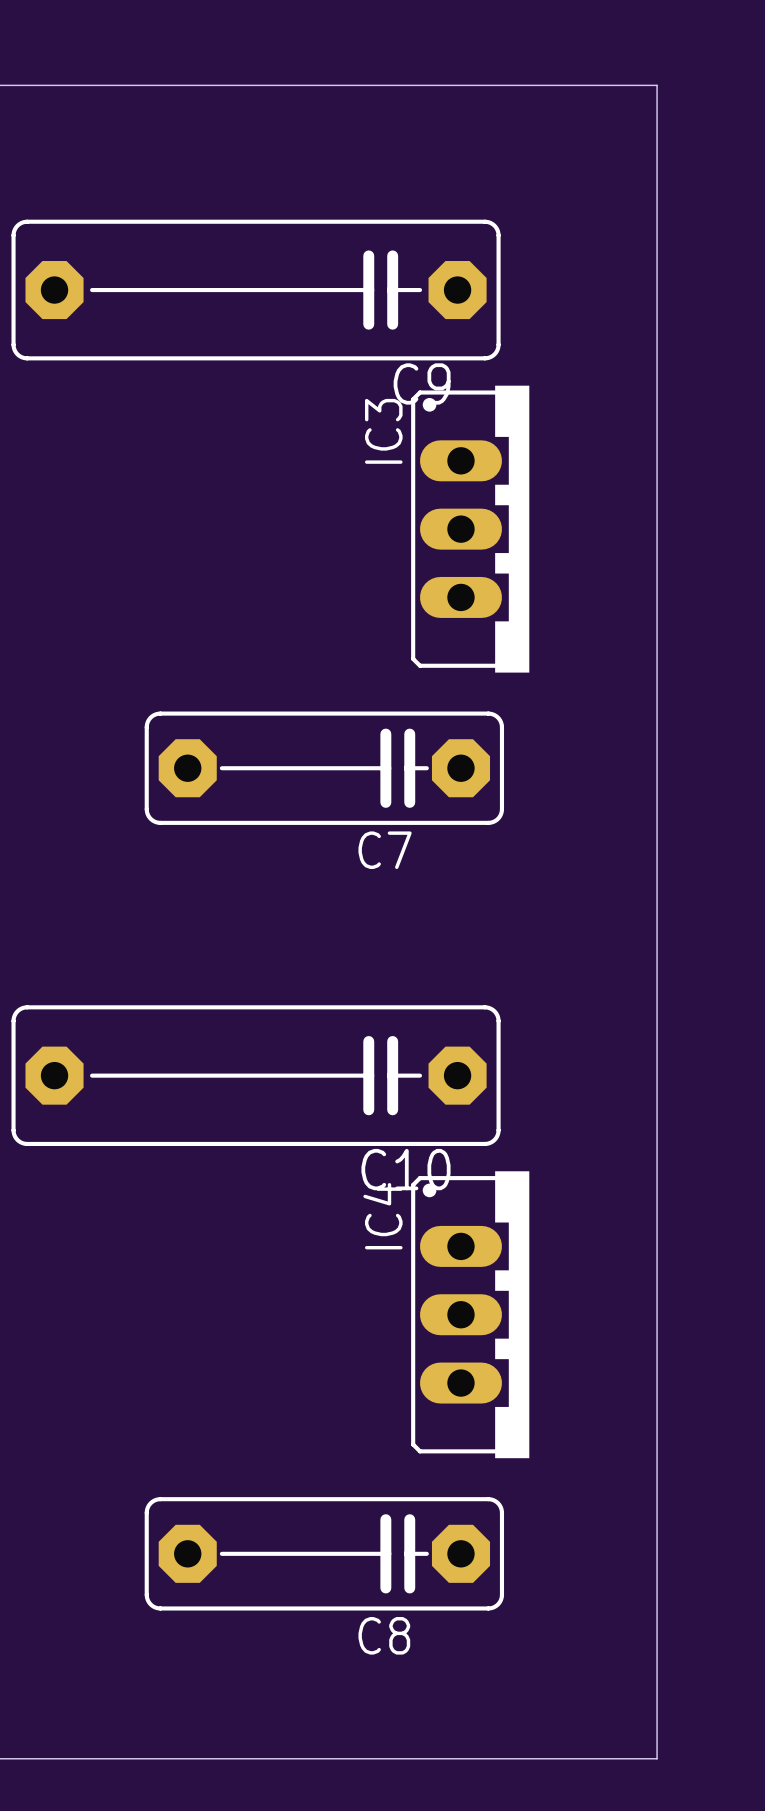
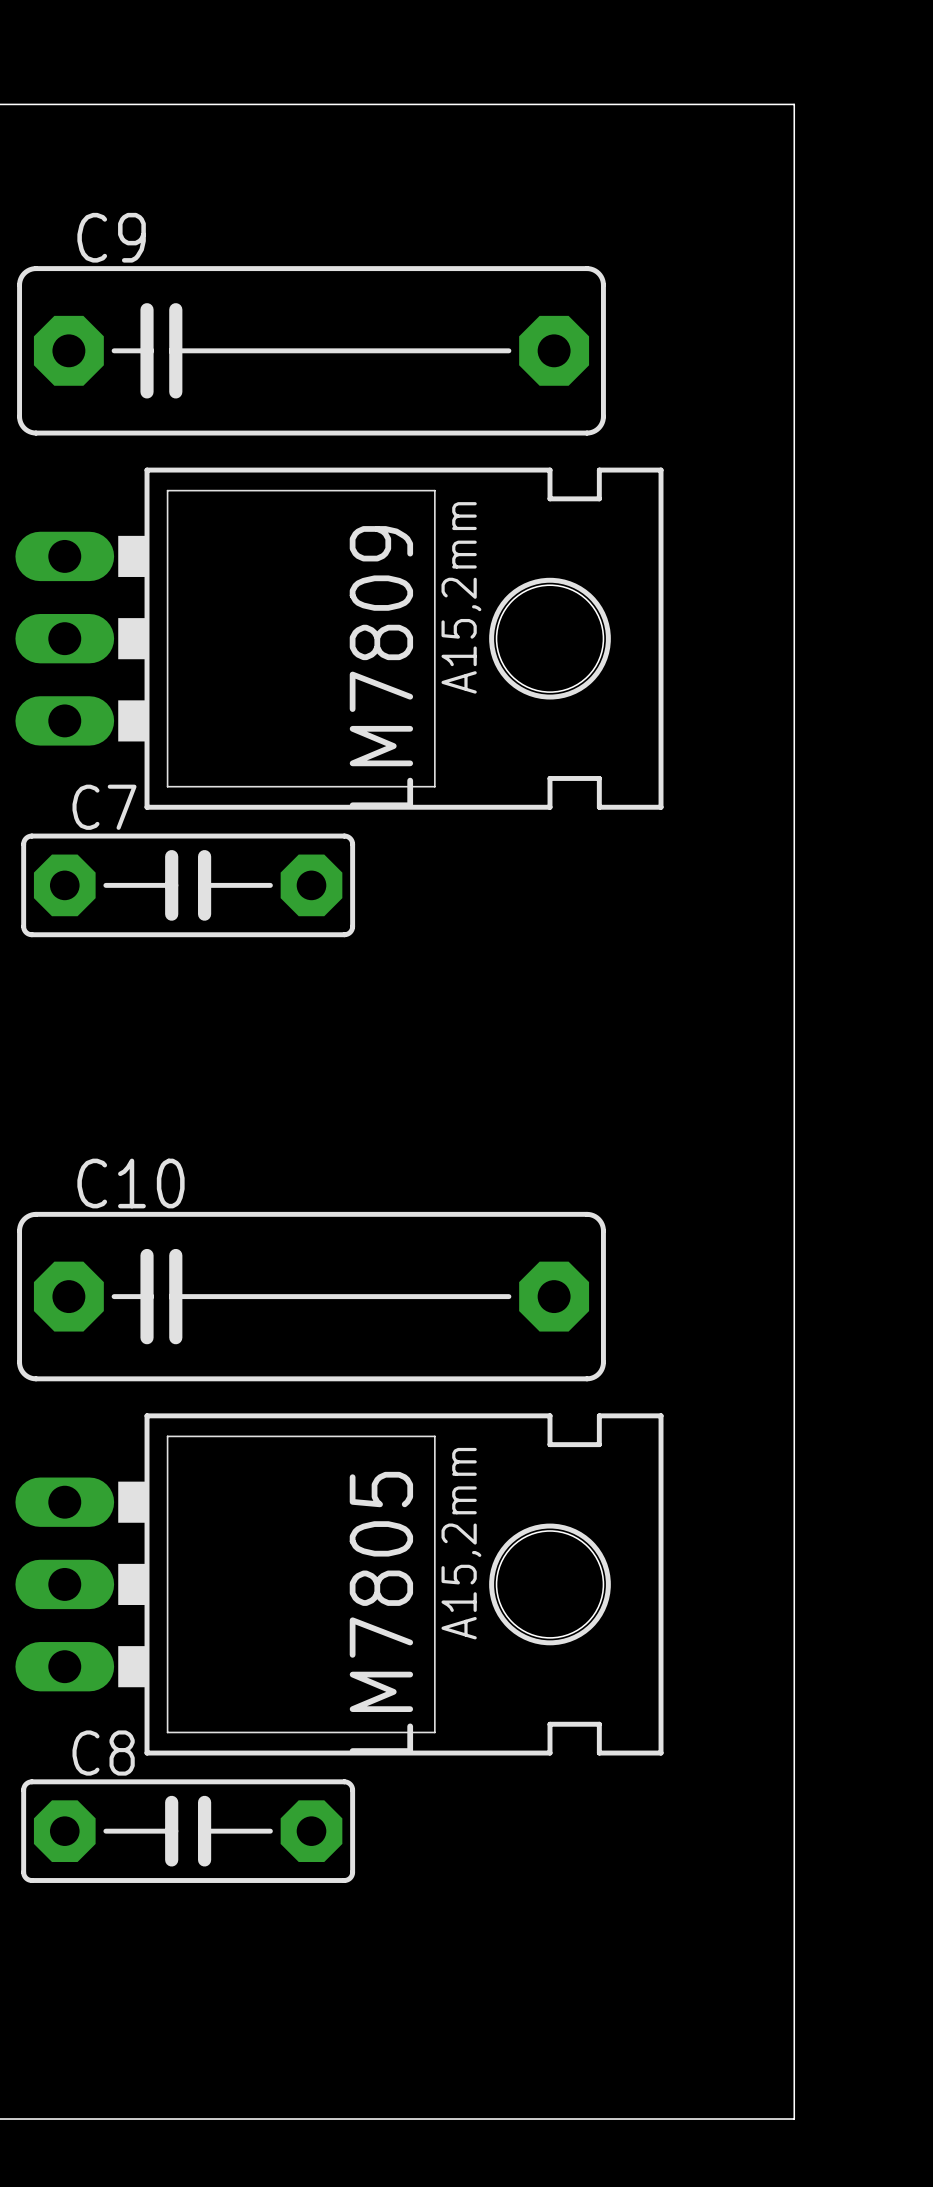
C9 rotation: 0° (256, 290) -> 180° (311, 350)
LM7809: none -> (339, 638)
IC3: (470, 529) -> none
C7 footprint: [144, 711, 505, 825] -> [21, 833, 356, 938]
C7 name position: C7 (385, 850) -> C7 (104, 807)
C10 rotation: 0° (256, 1075) -> 180° (311, 1296)
LM7805: none -> (339, 1584)
IC4: (470, 1314) -> none
C8 footprint: [144, 1497, 505, 1611] -> [21, 1779, 356, 1883]
C8 name position: C8 (384, 1635) -> C8 (103, 1753)

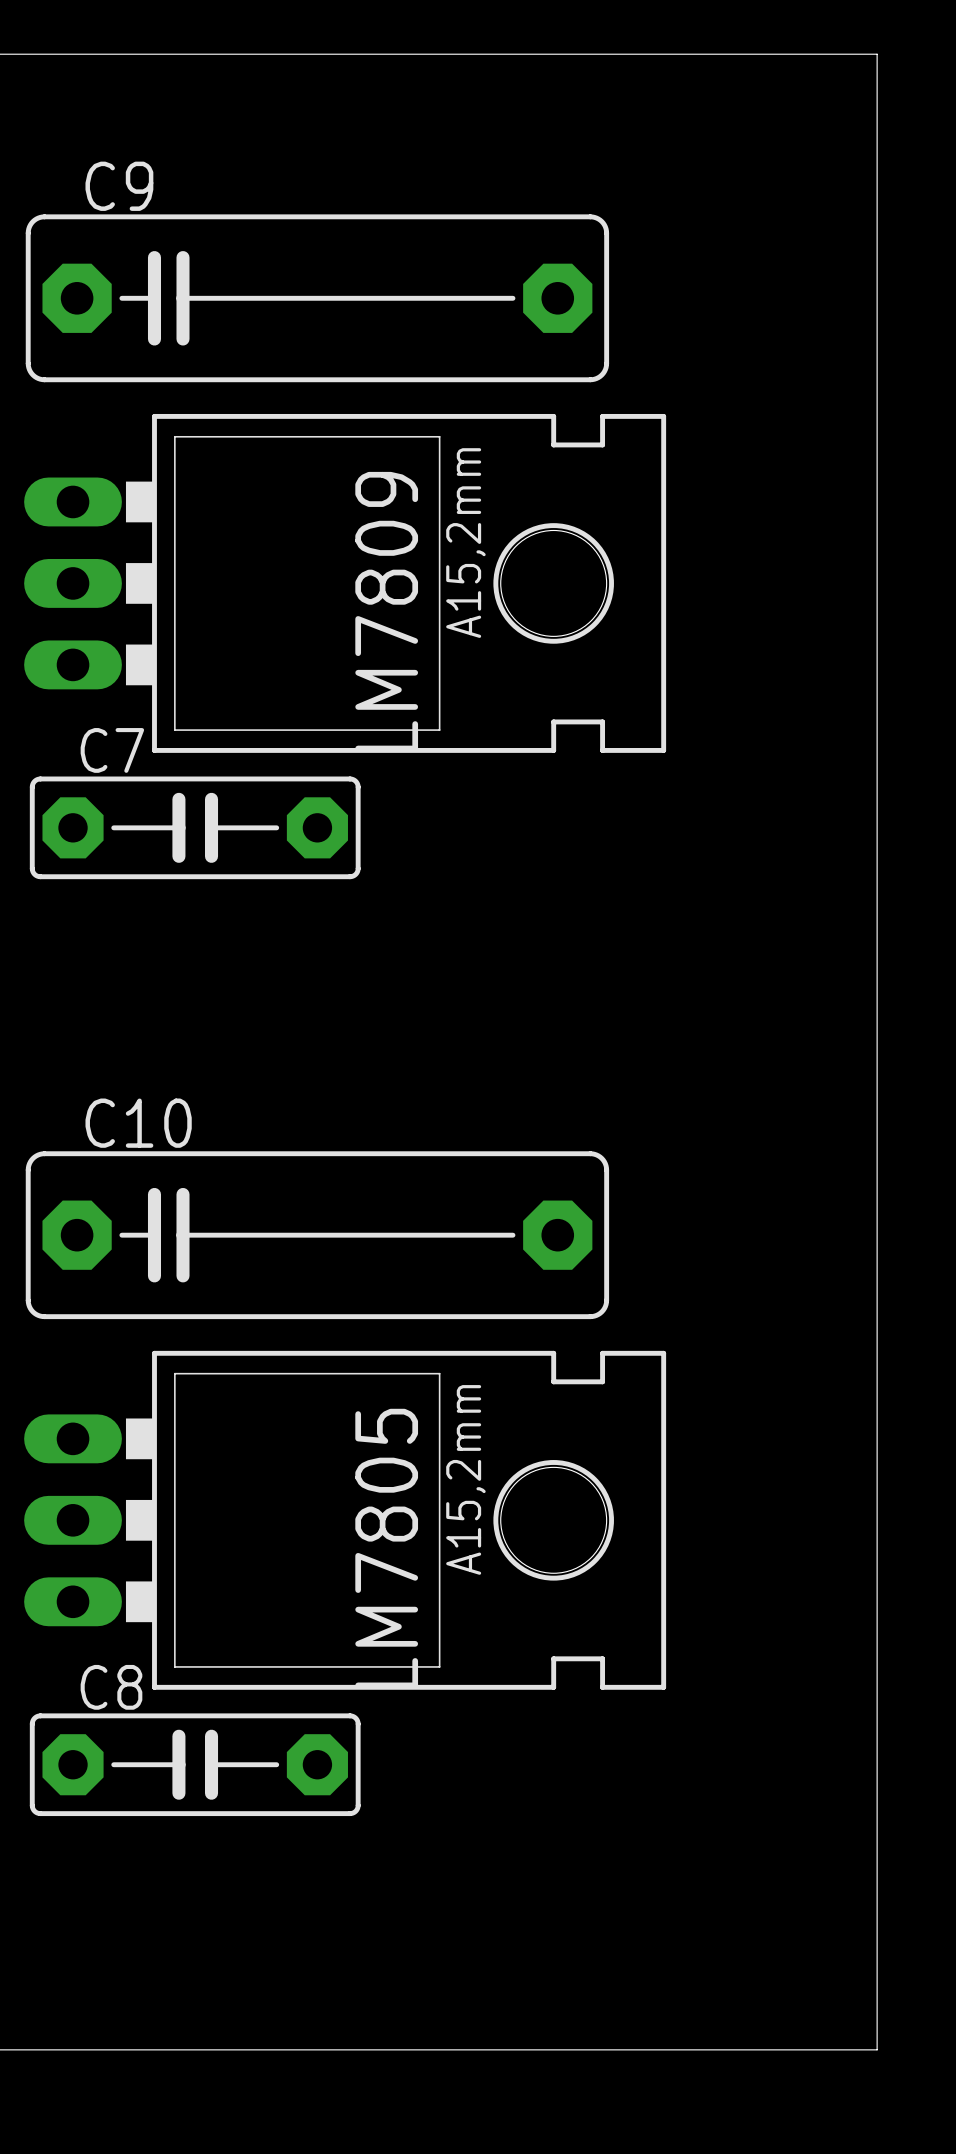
board edge: (794, 104) (794, 2119) -> (795, 54) (877, 54) (877, 2049) (795, 2049)

